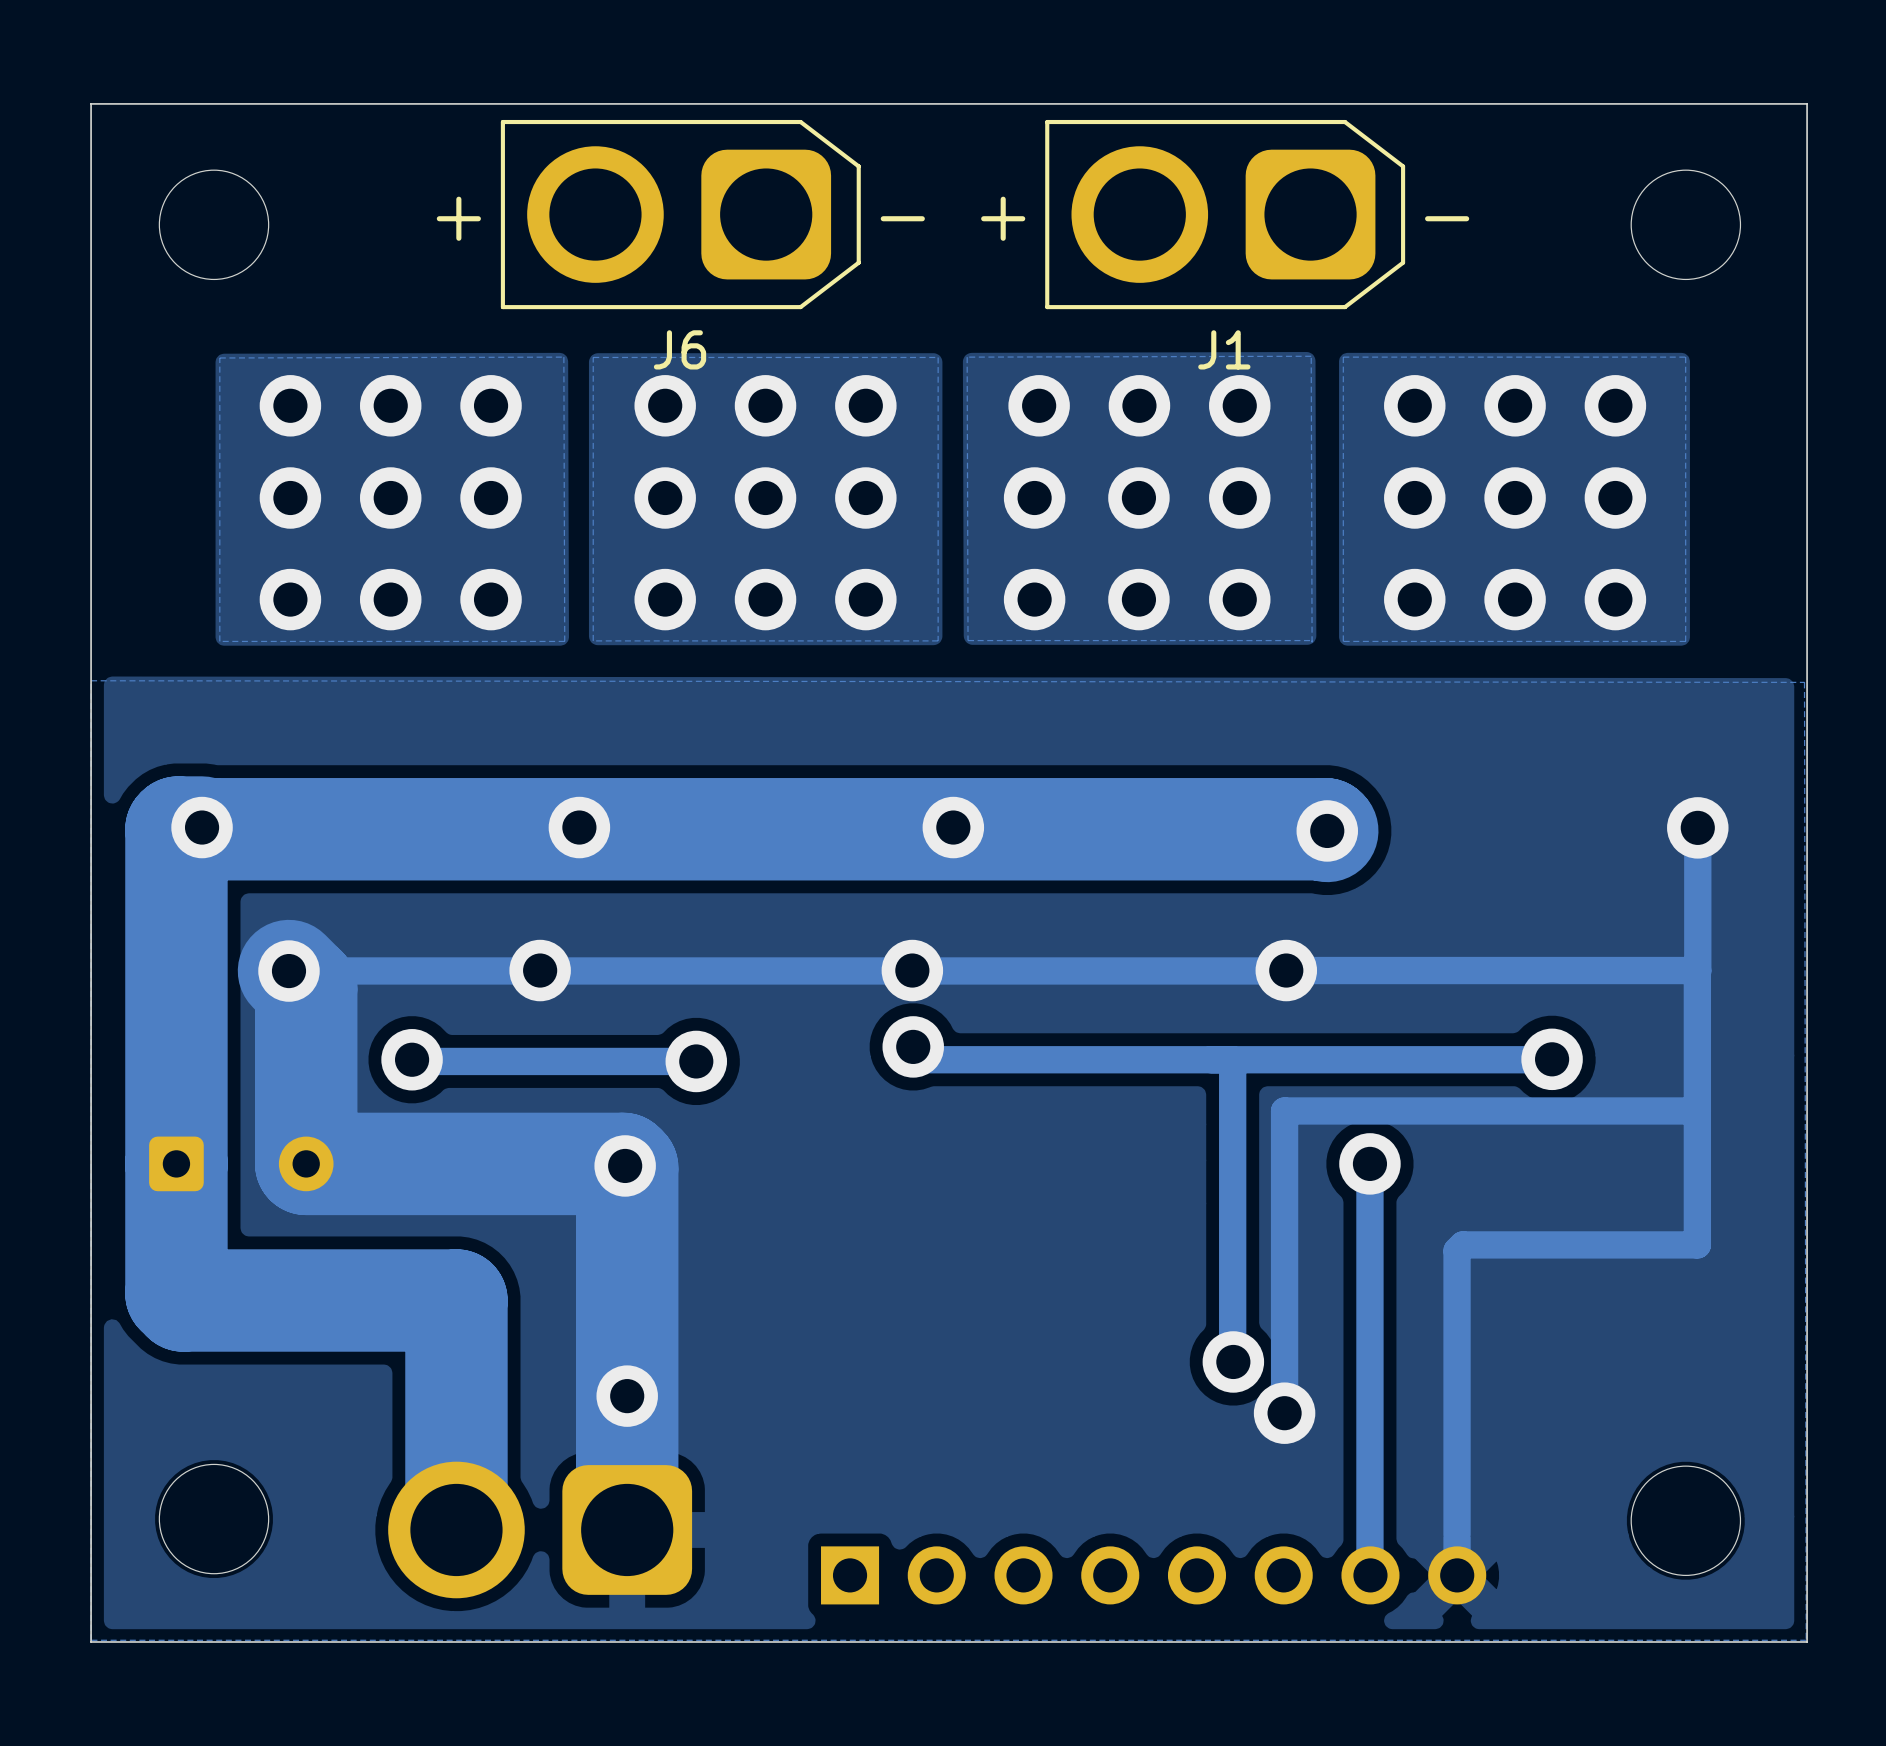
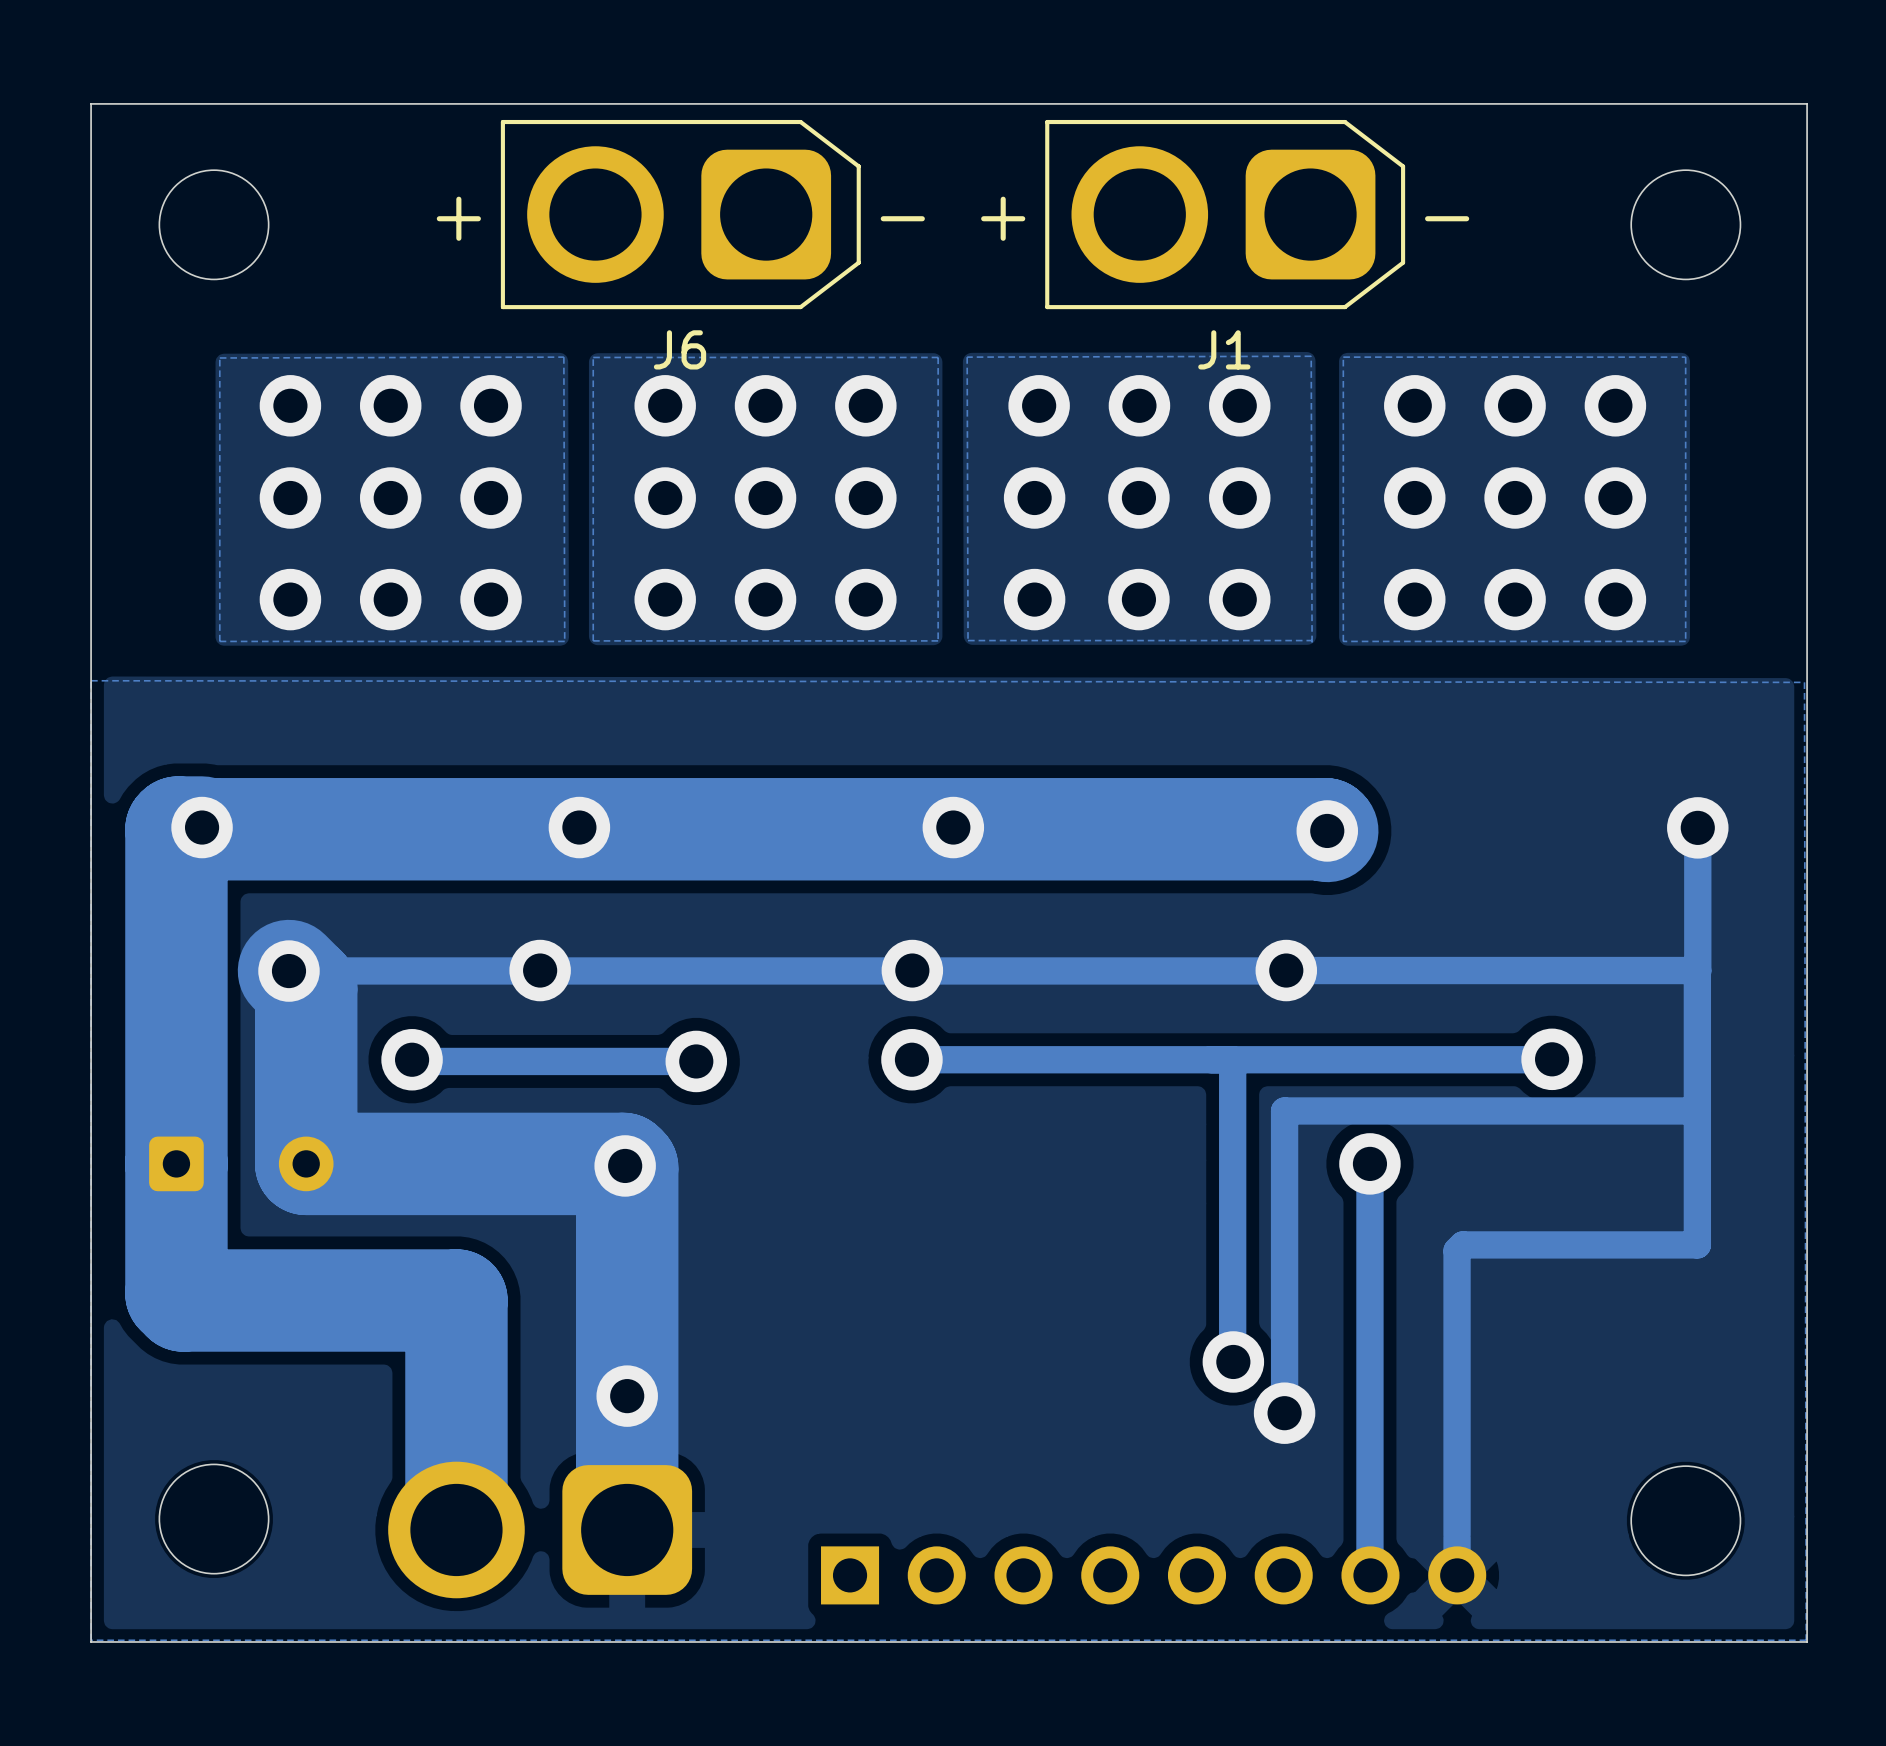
via position: (913, 1046) -> (911, 1059)

